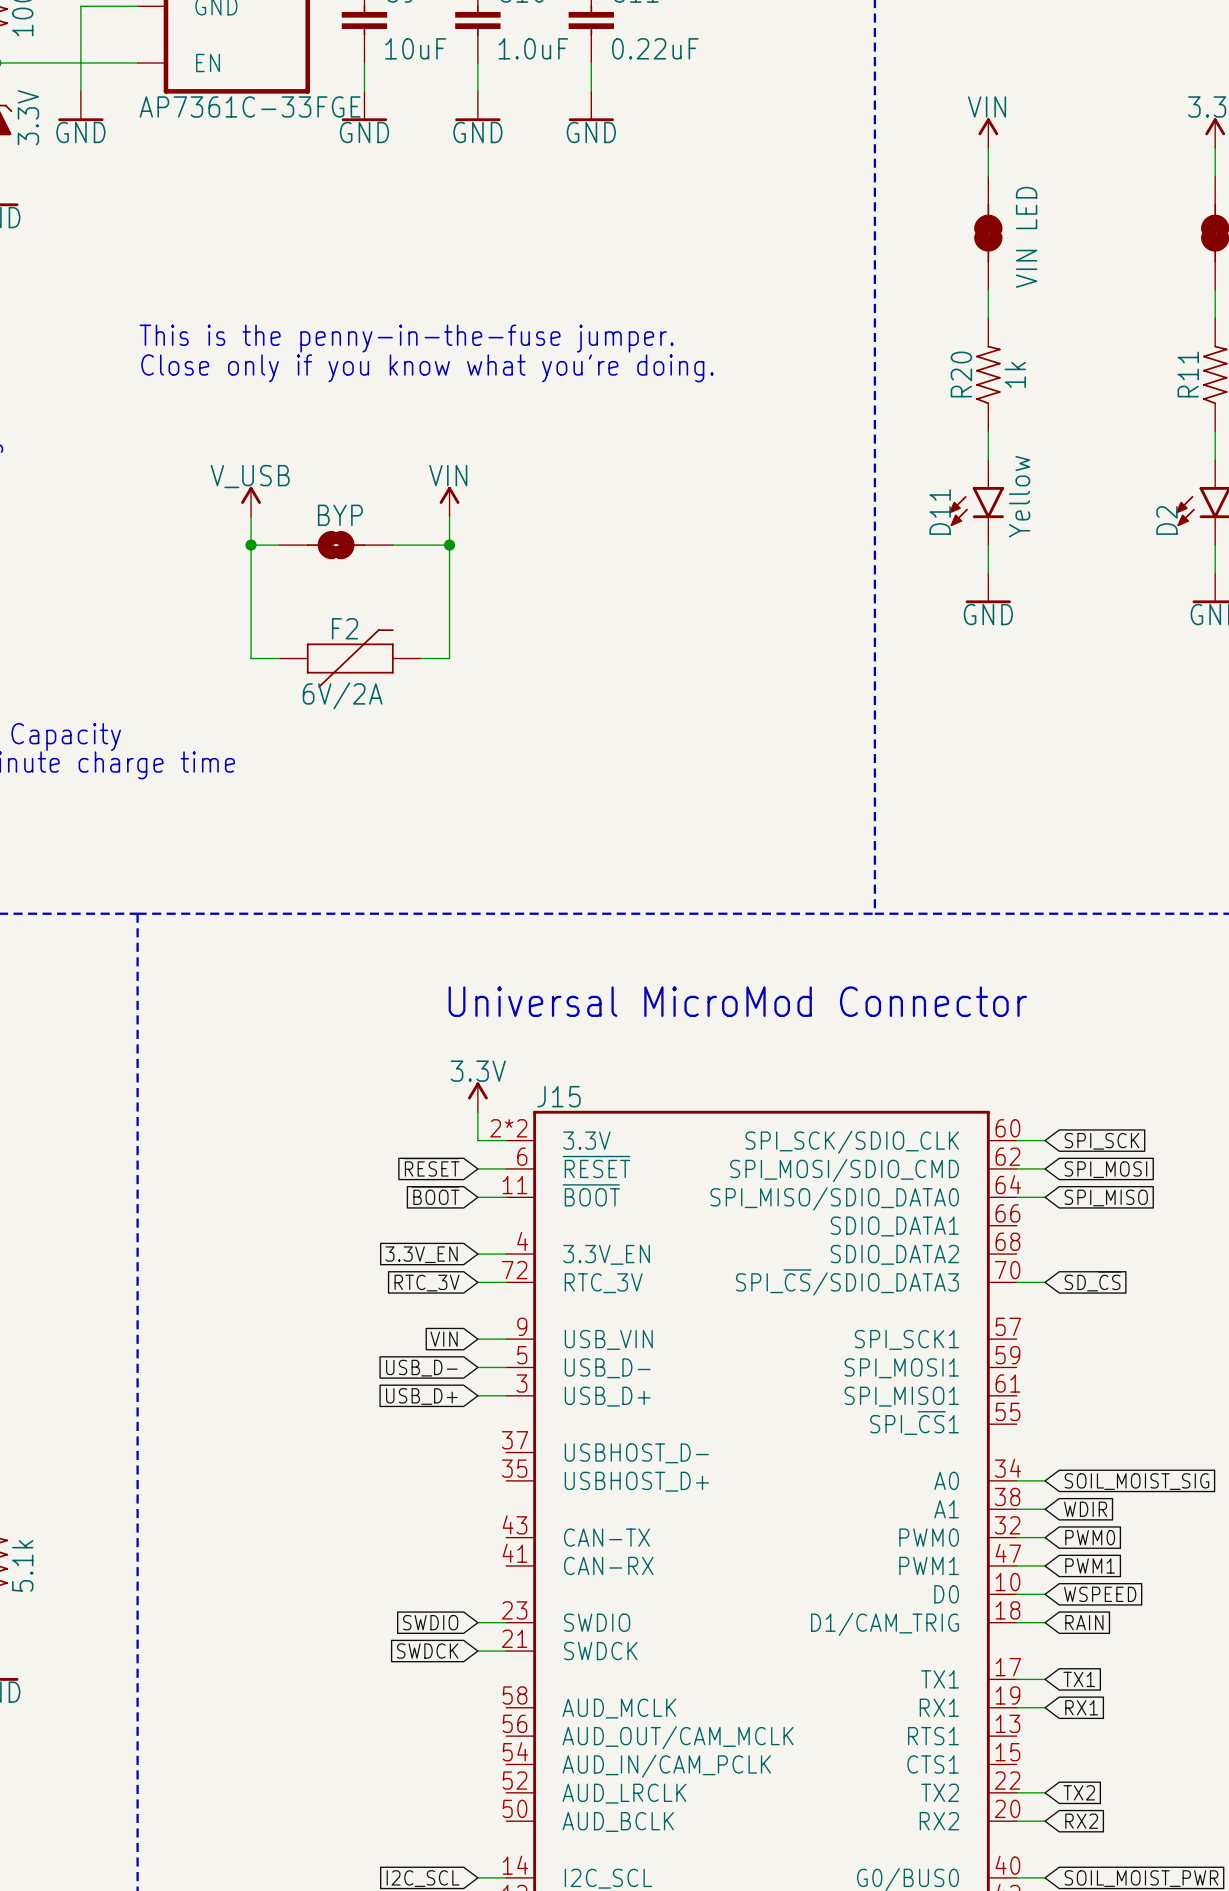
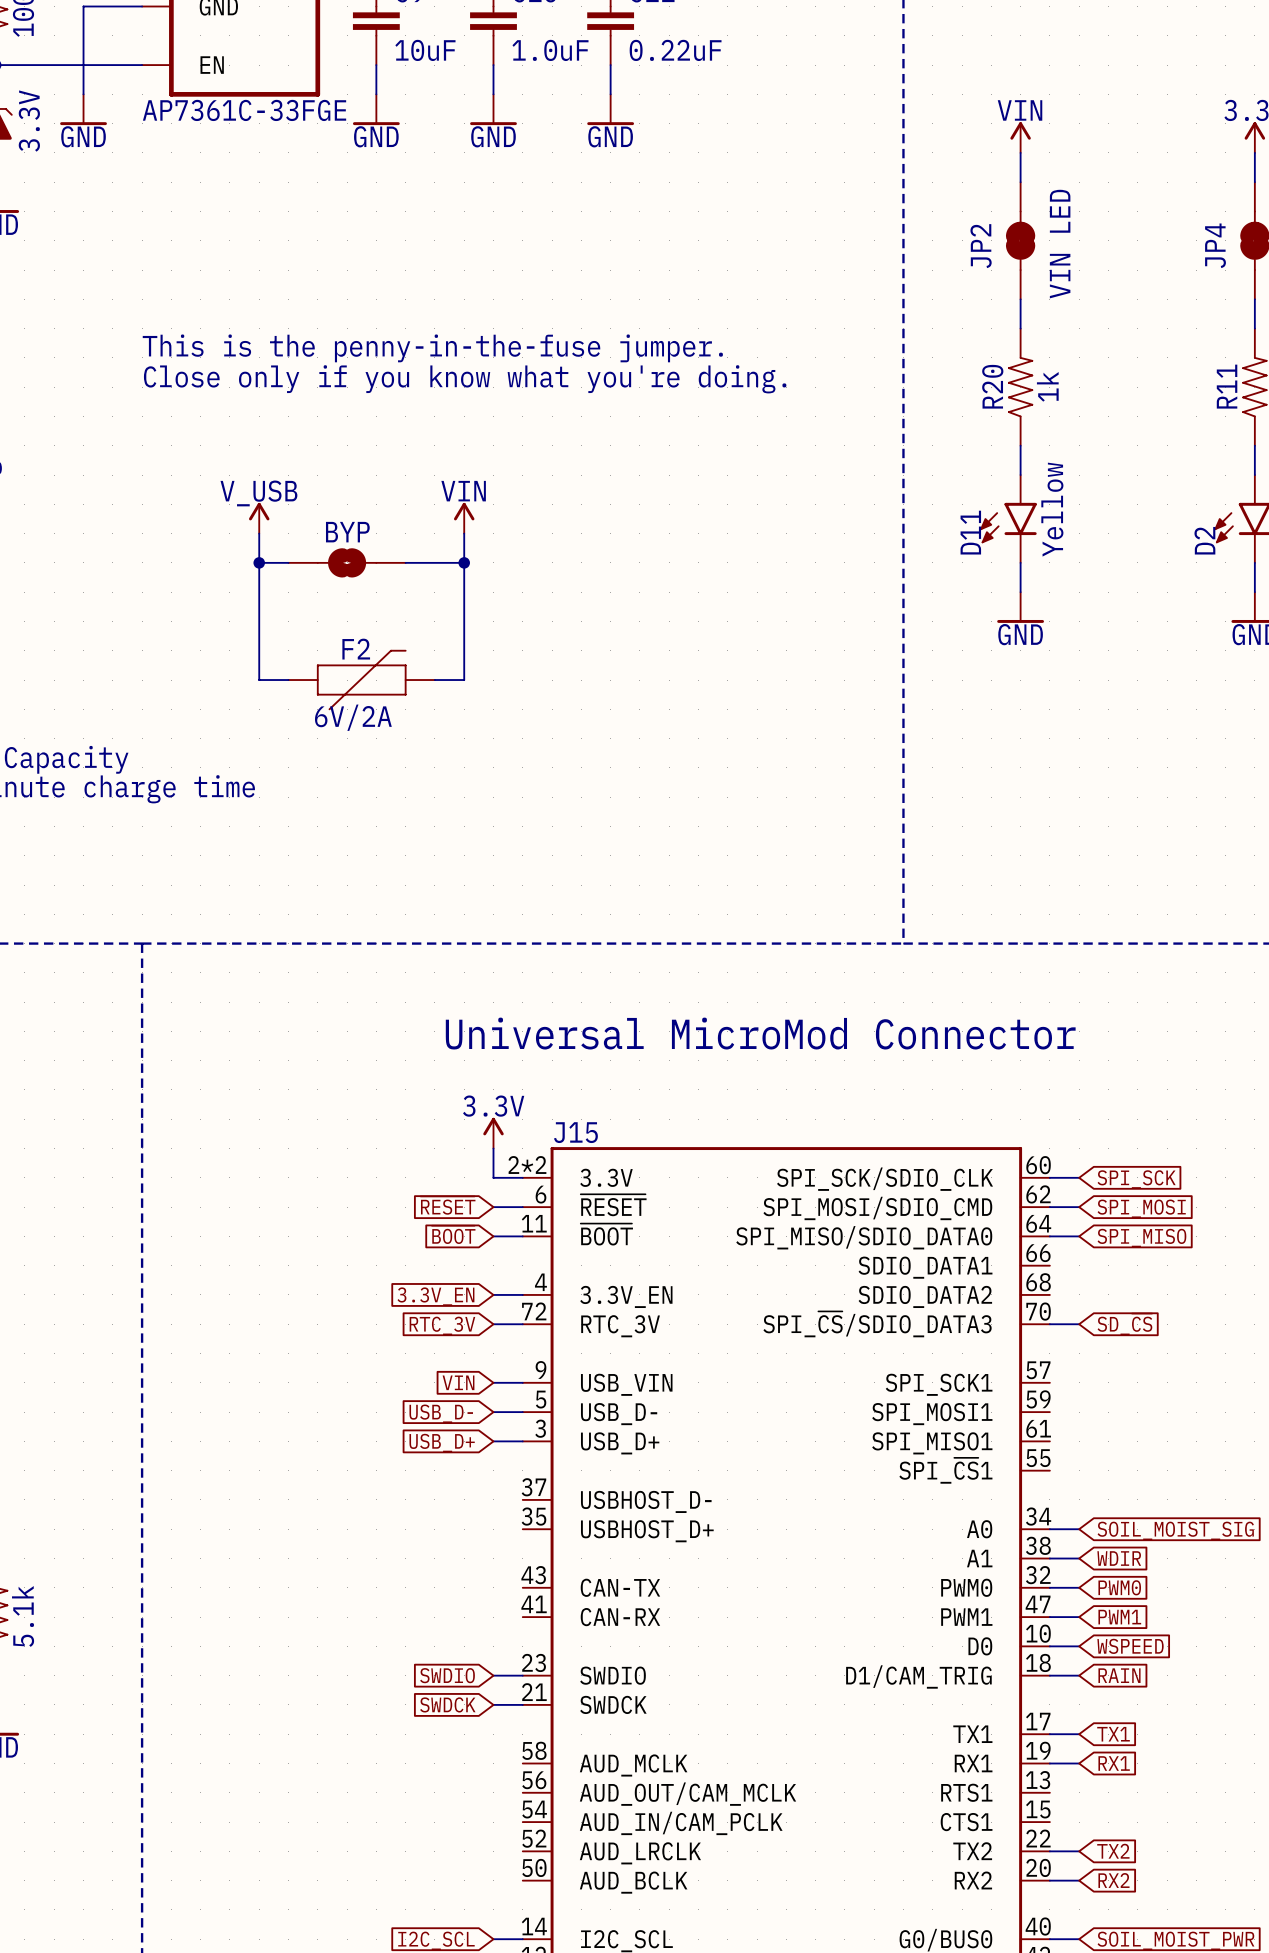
JP2 name: none -> JP2 (981, 246)
JP4 name: none -> JP4 (1215, 245)

